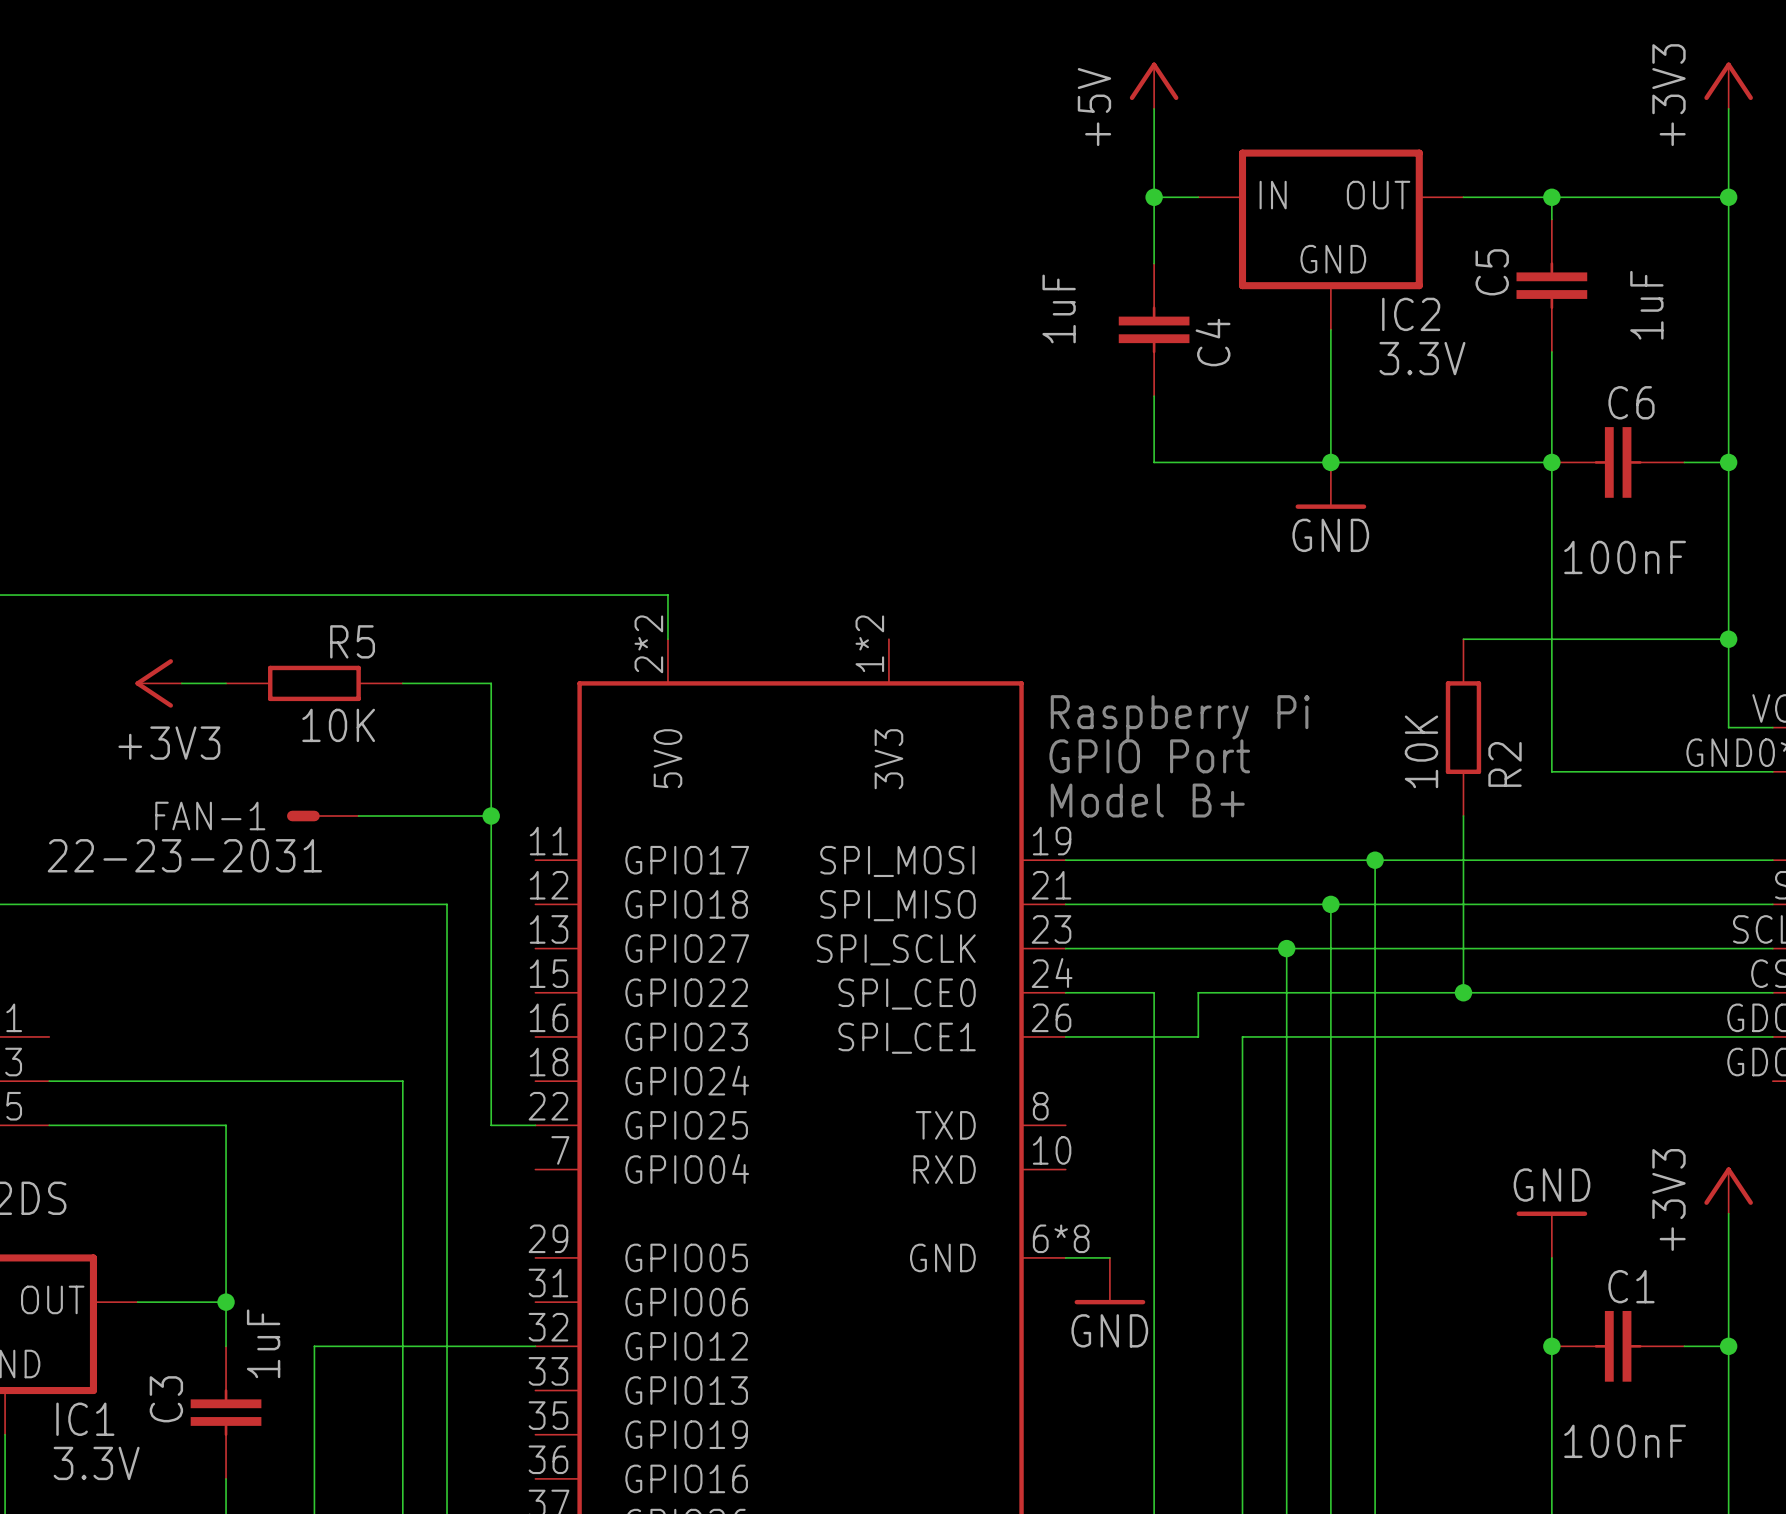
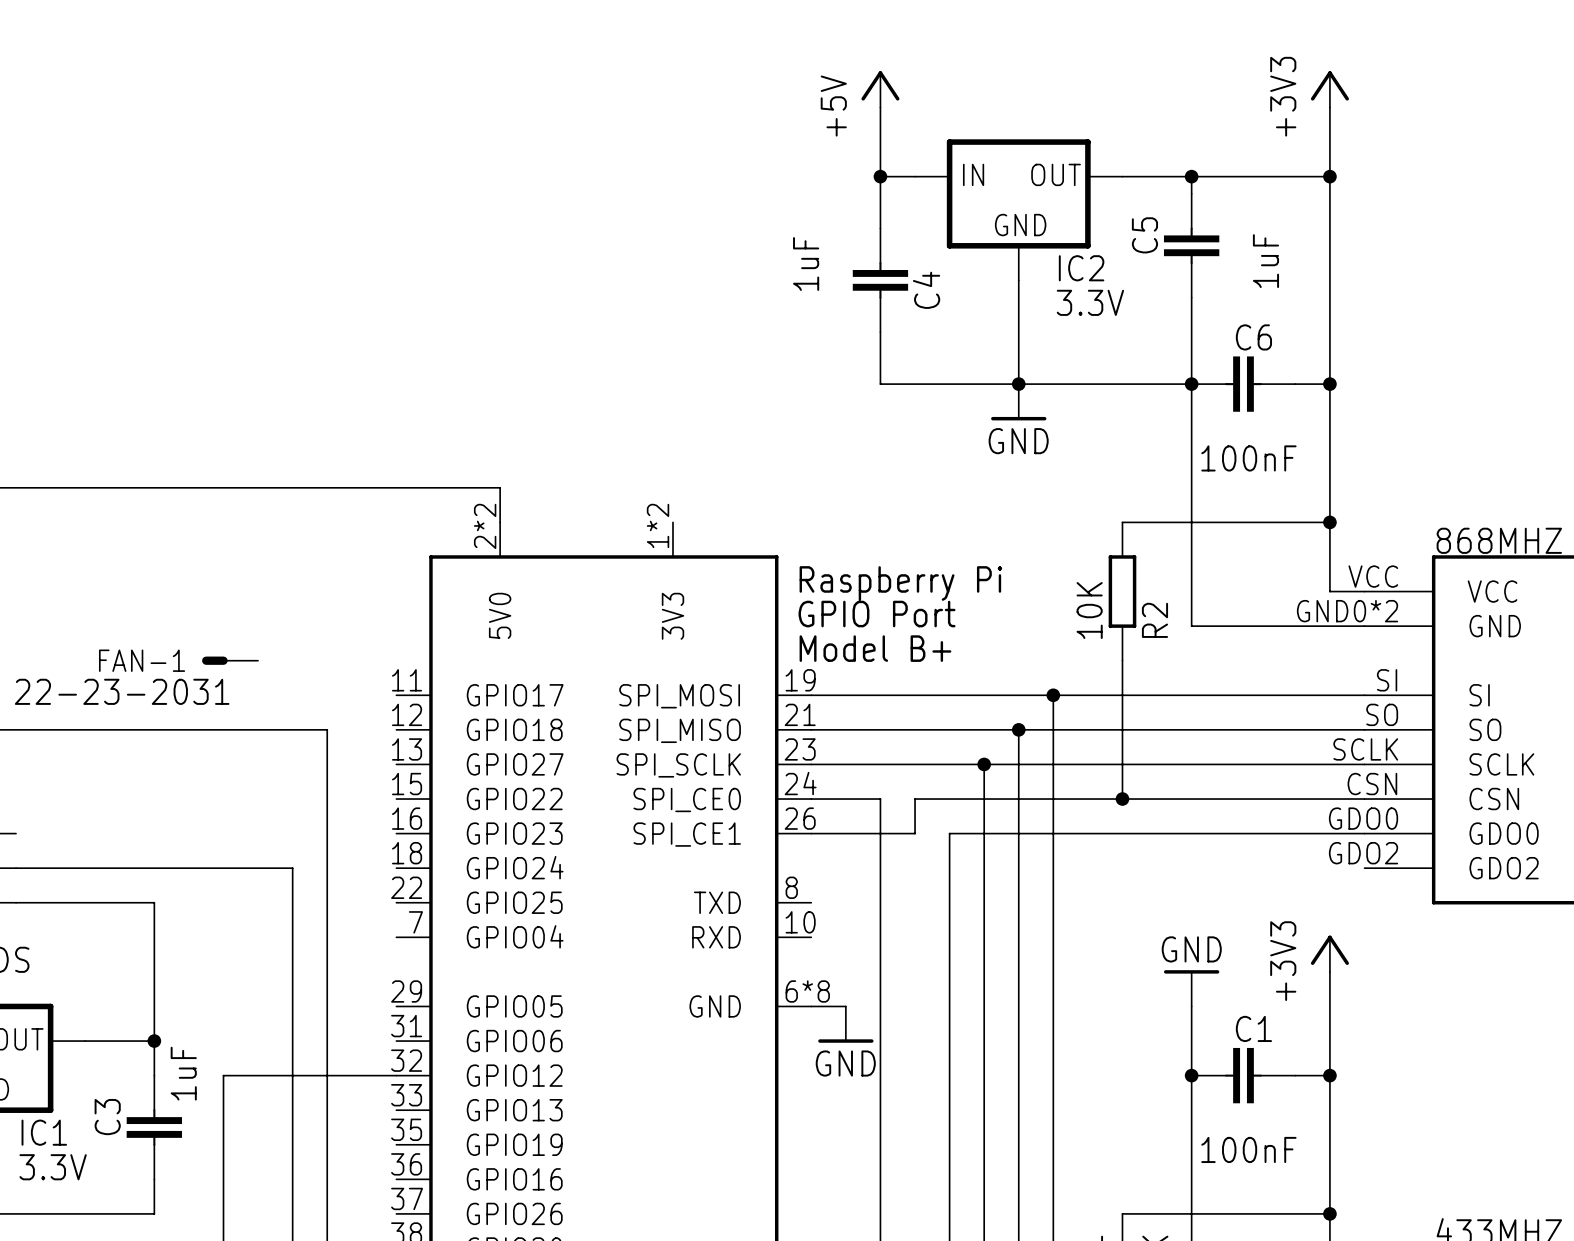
power symbol: +3V3 (158, 683) -> none
wire: (181, 683) (226, 683) -> none
R5: 10K (314, 683) -> none
wire: (402, 683) (491, 683) (491, 1125) (535, 1125) -> none
wire: (358, 816) (491, 816) -> none
junction: (491, 816) -> none

